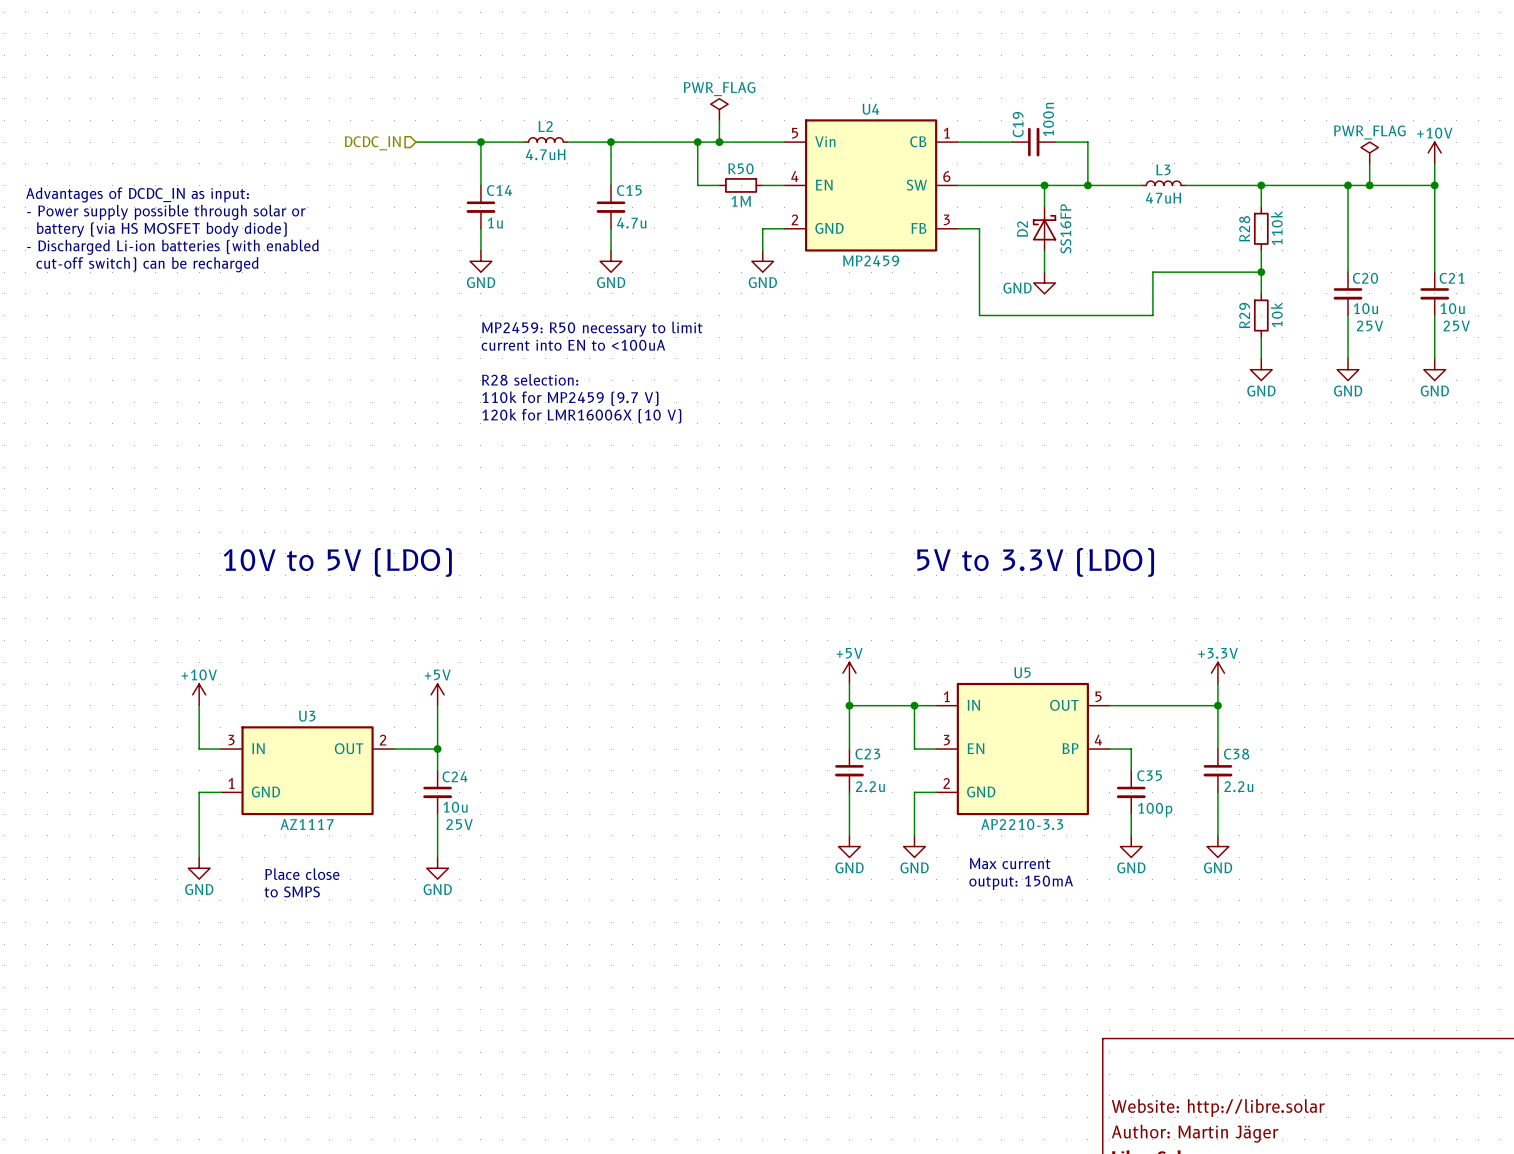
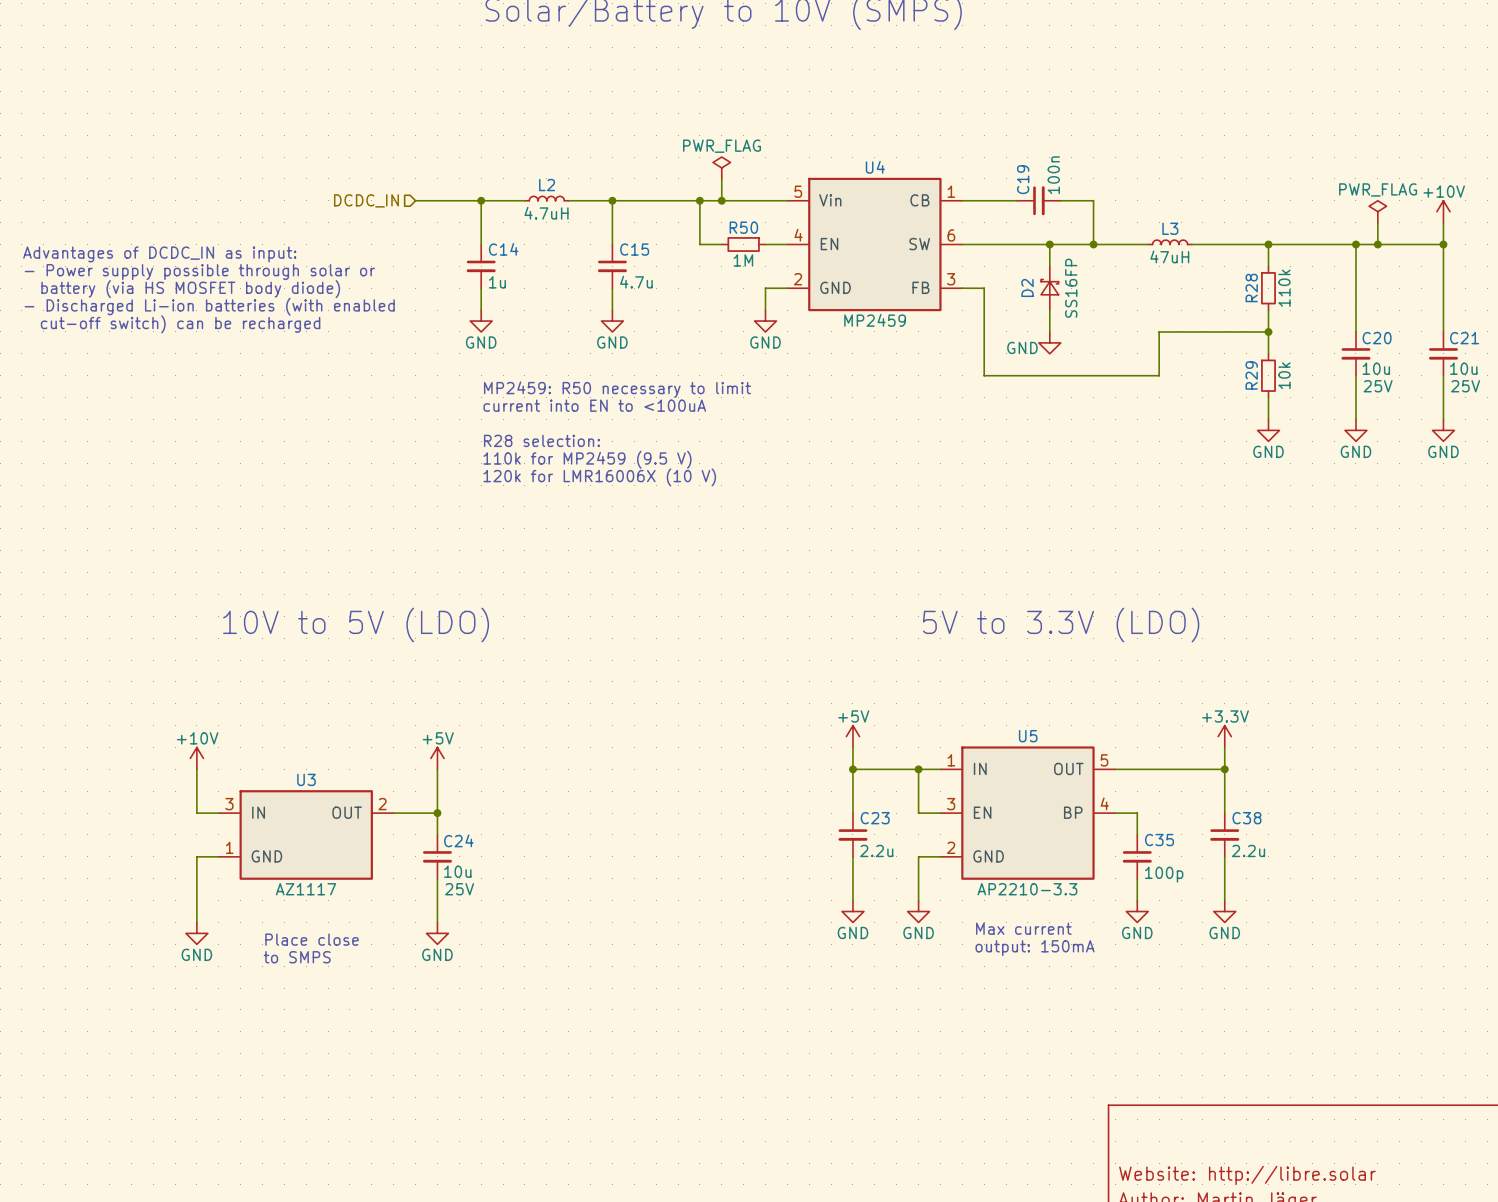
D2 symbol: [1032, 207, 1057, 251] -> [1041, 266, 1059, 311]
text: 110k for MP2459 (9.7 V) (570, 398) -> 110k for MP2459 (9.5 V) (587, 459)

